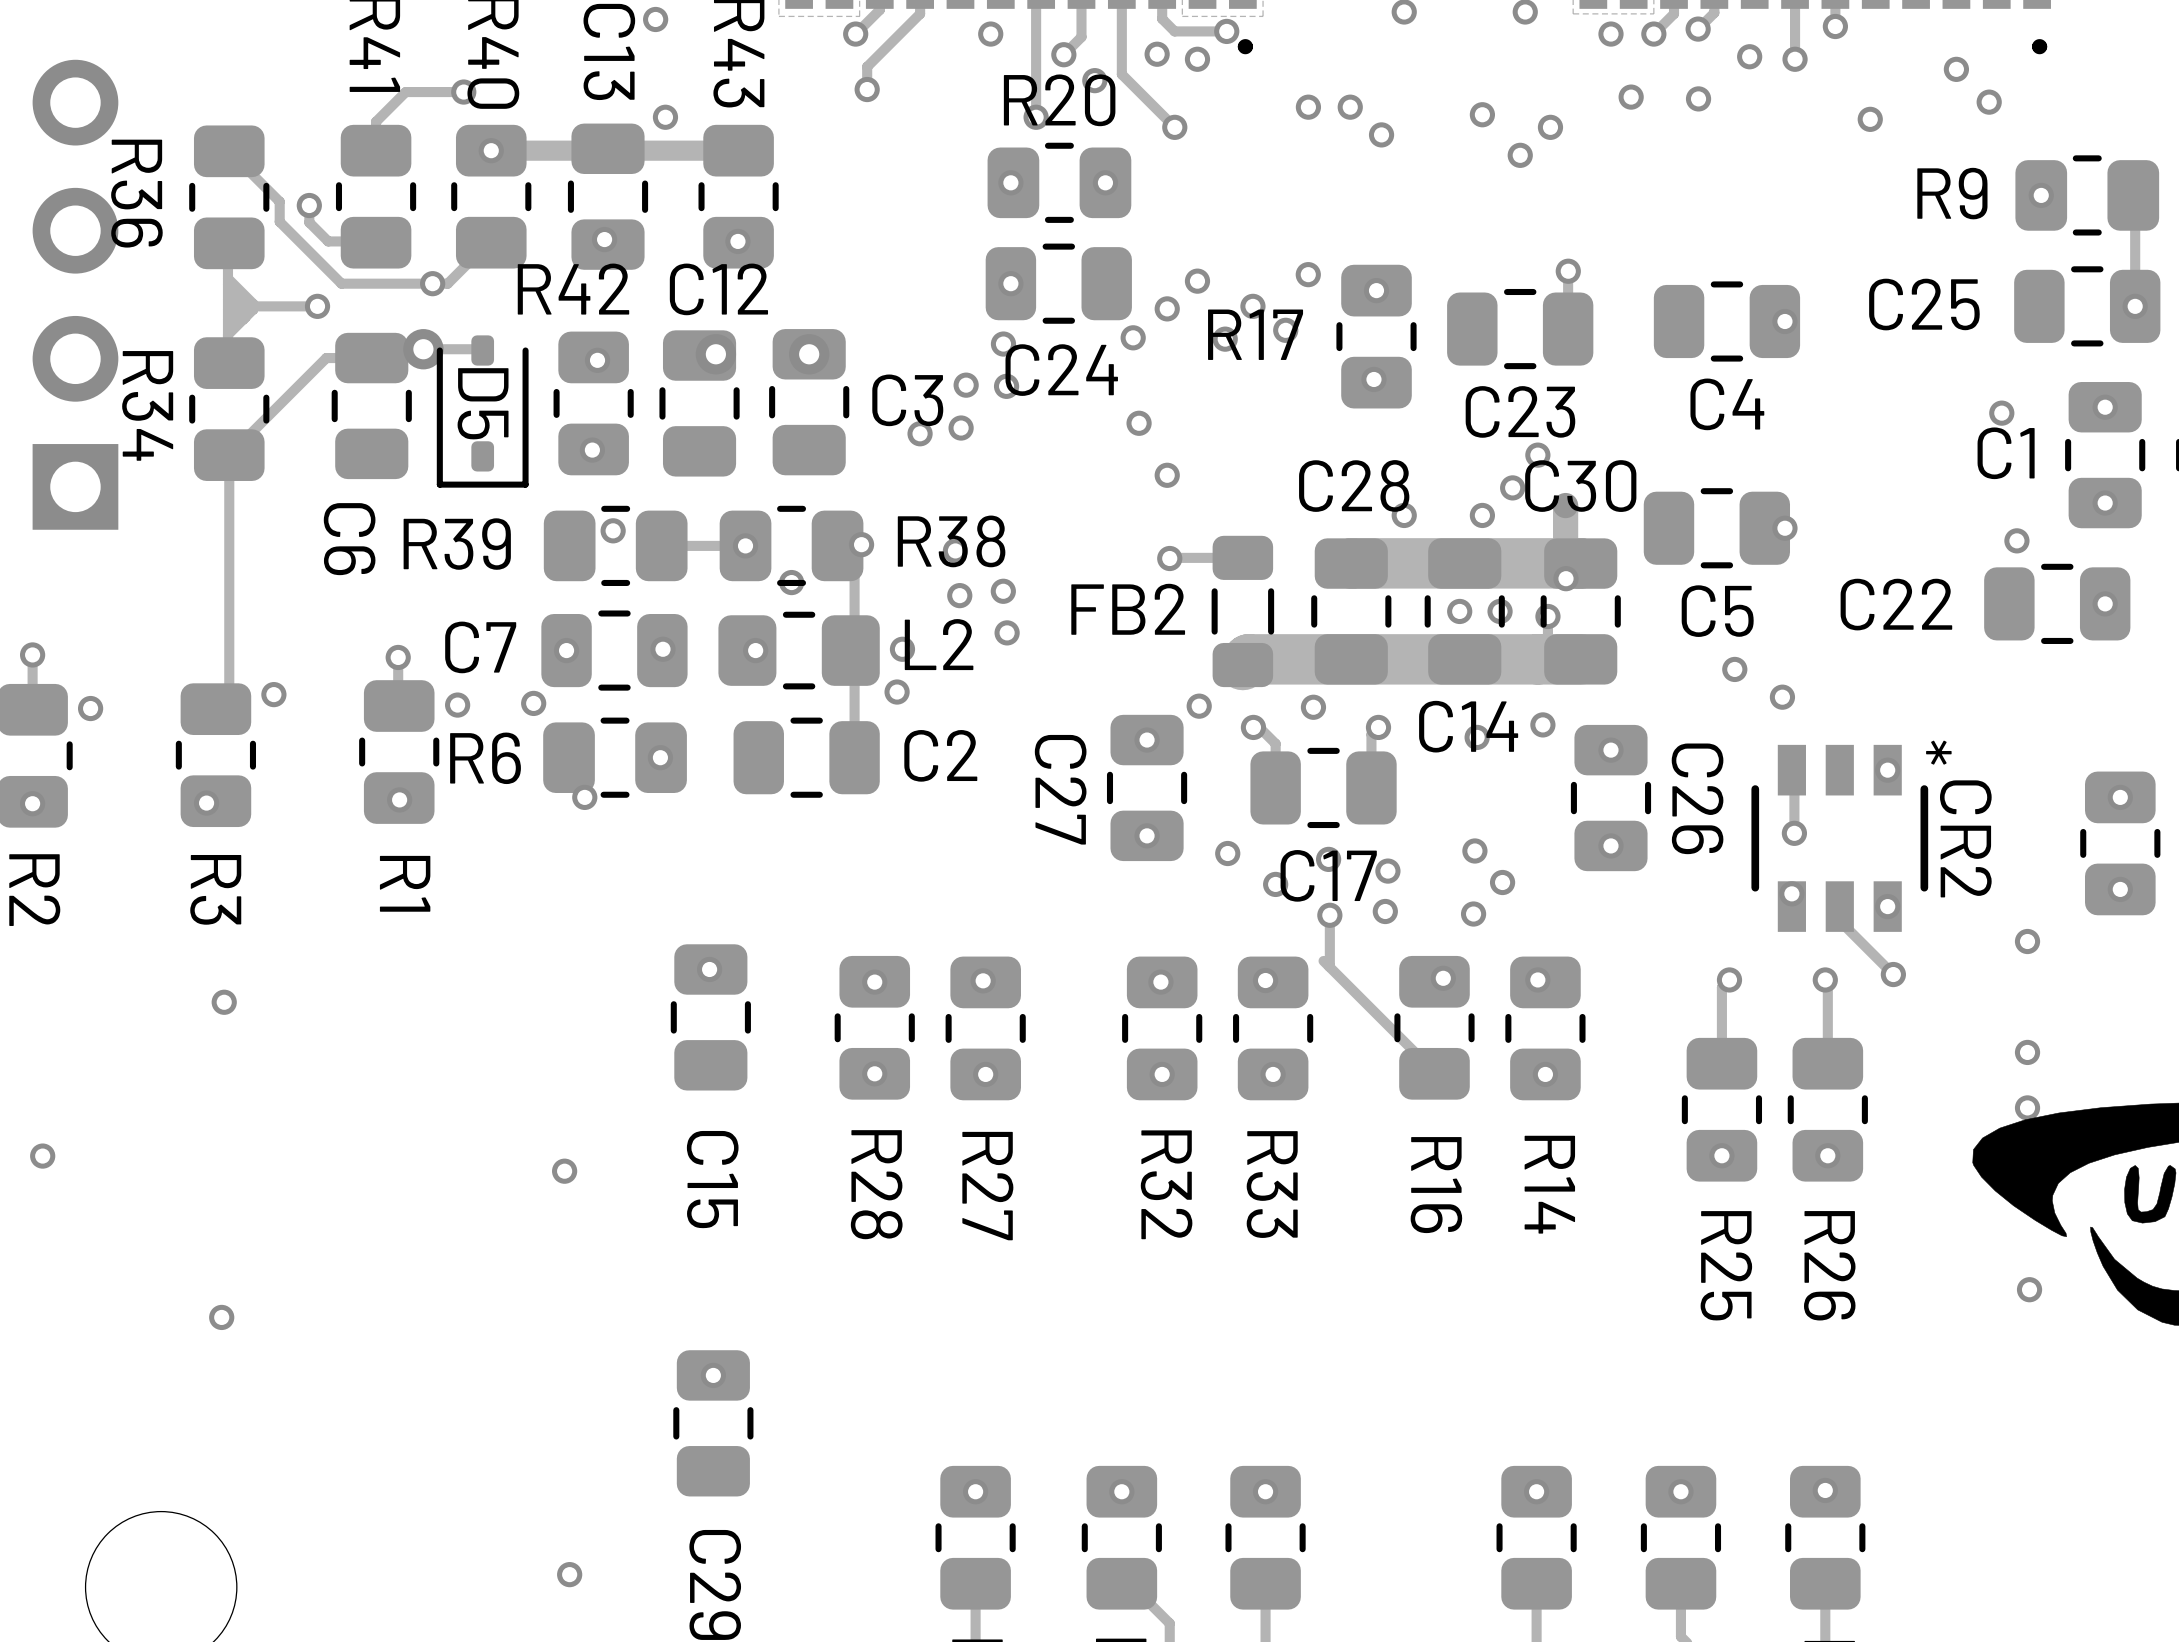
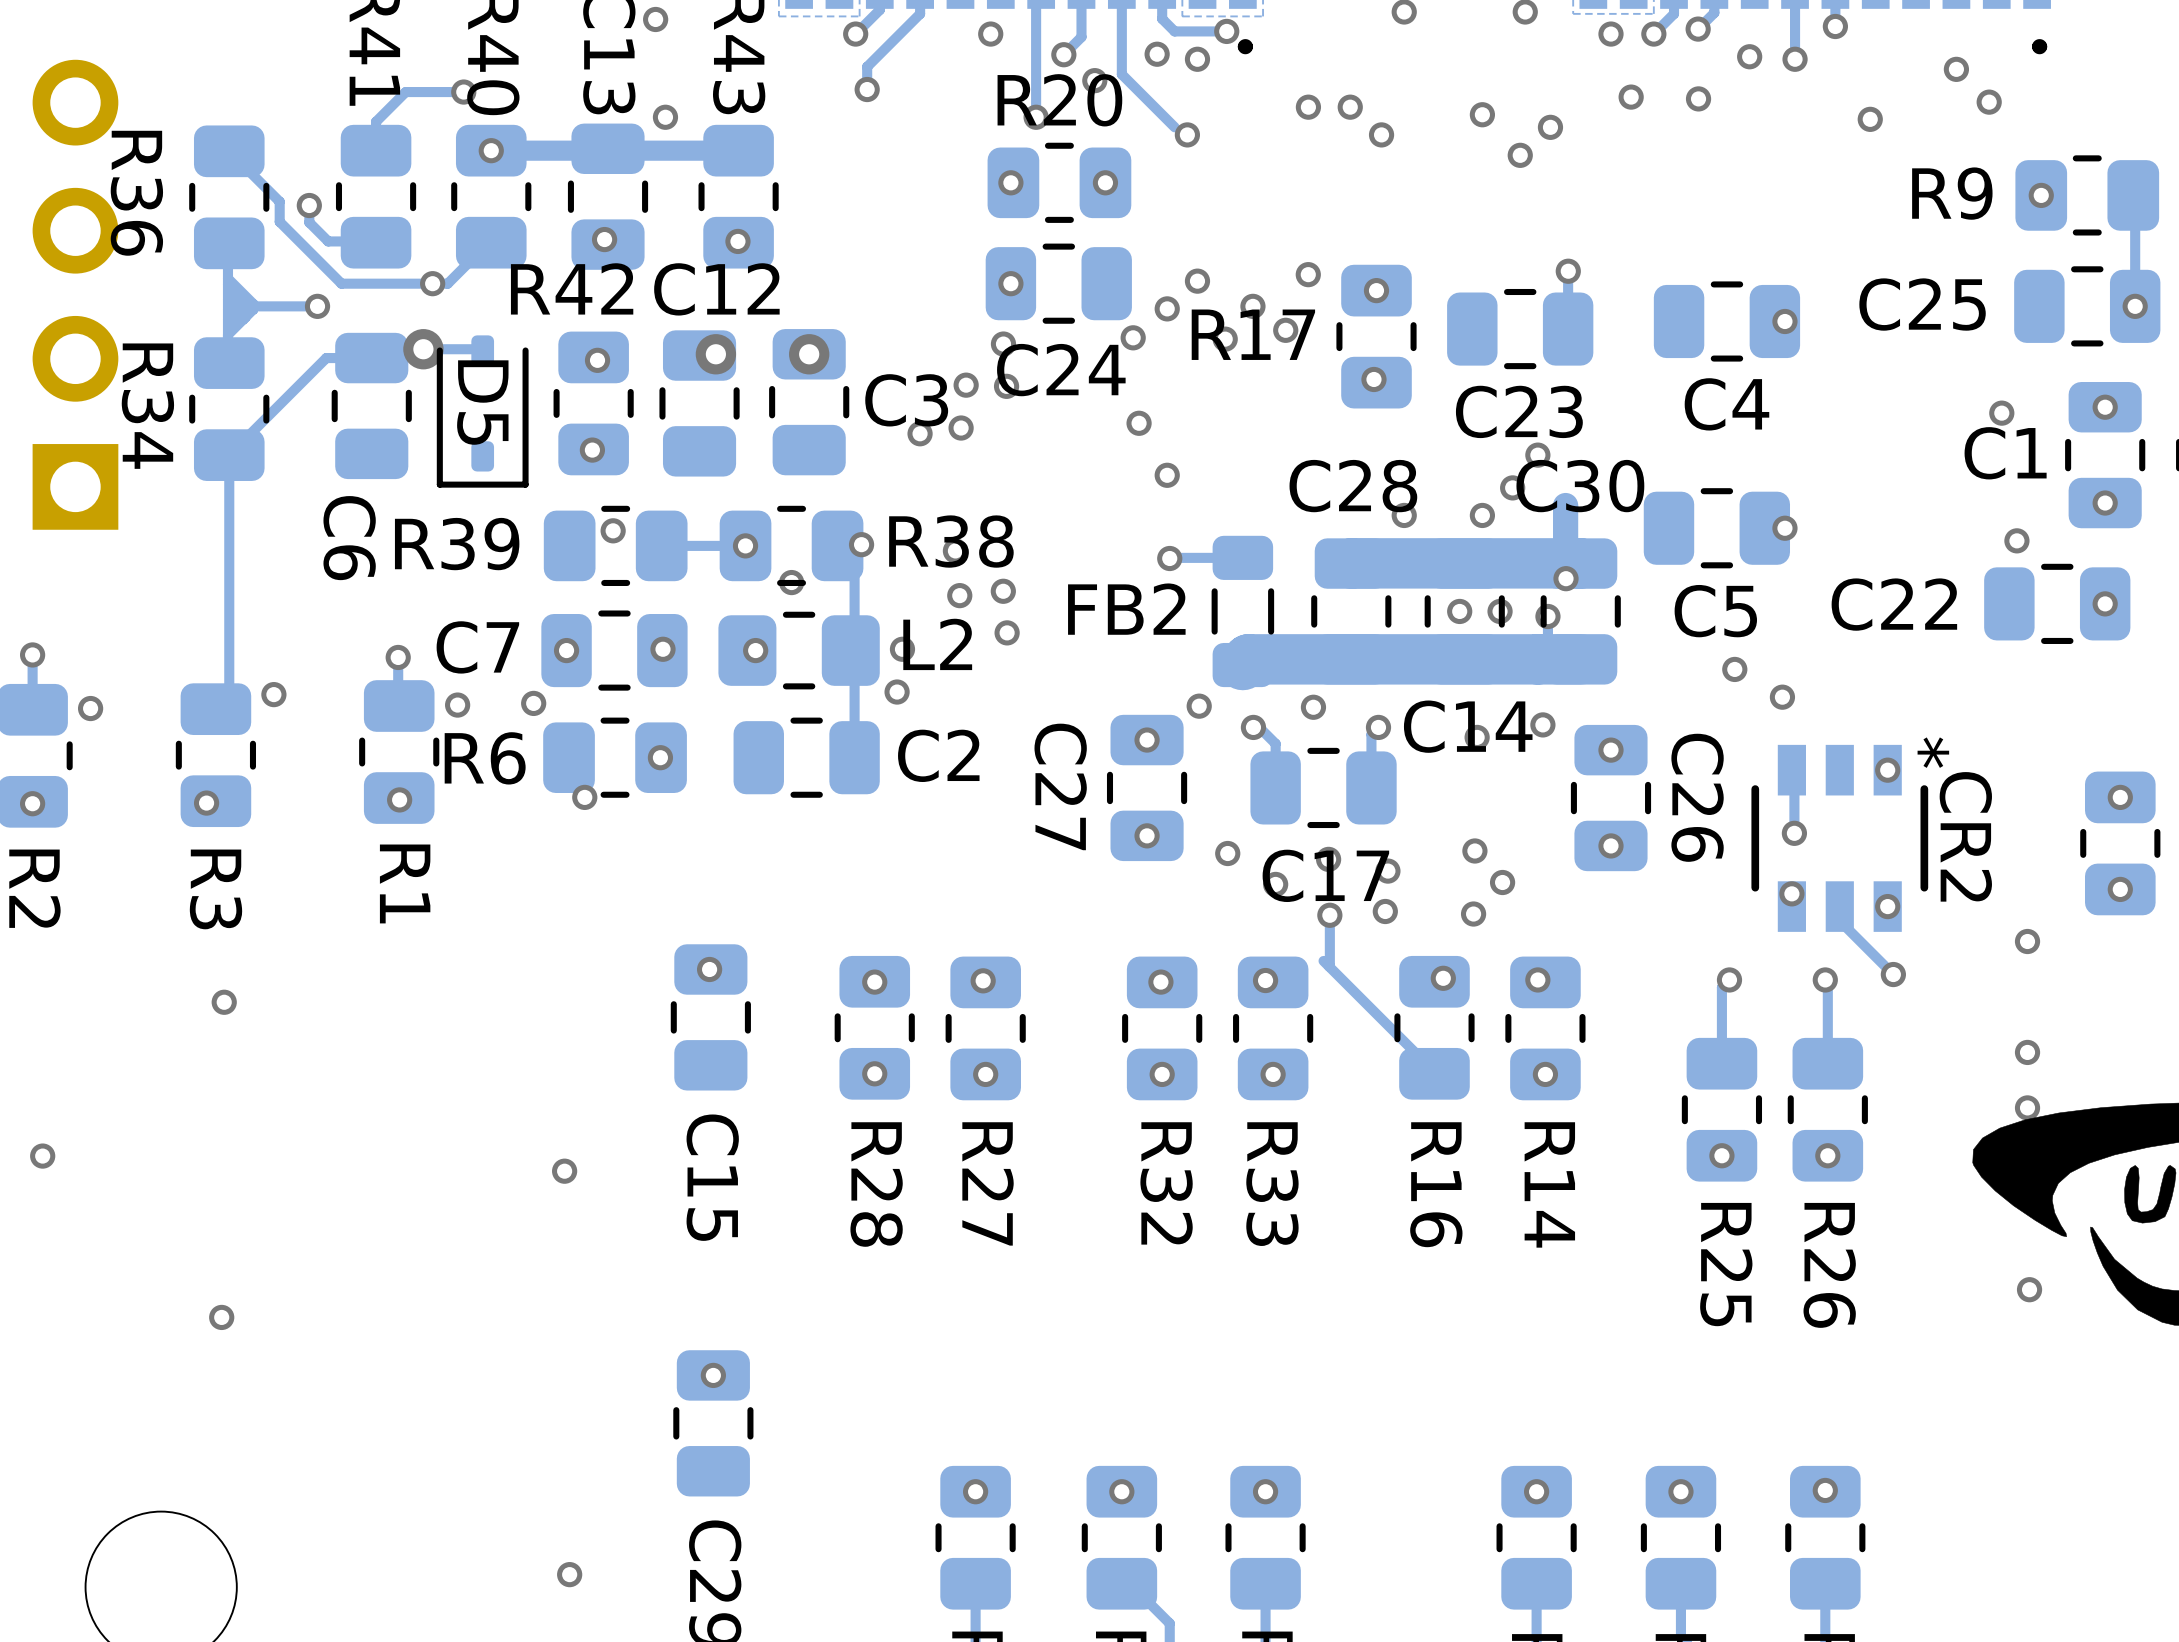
via position: (1174, 127) -> (1187, 134)

